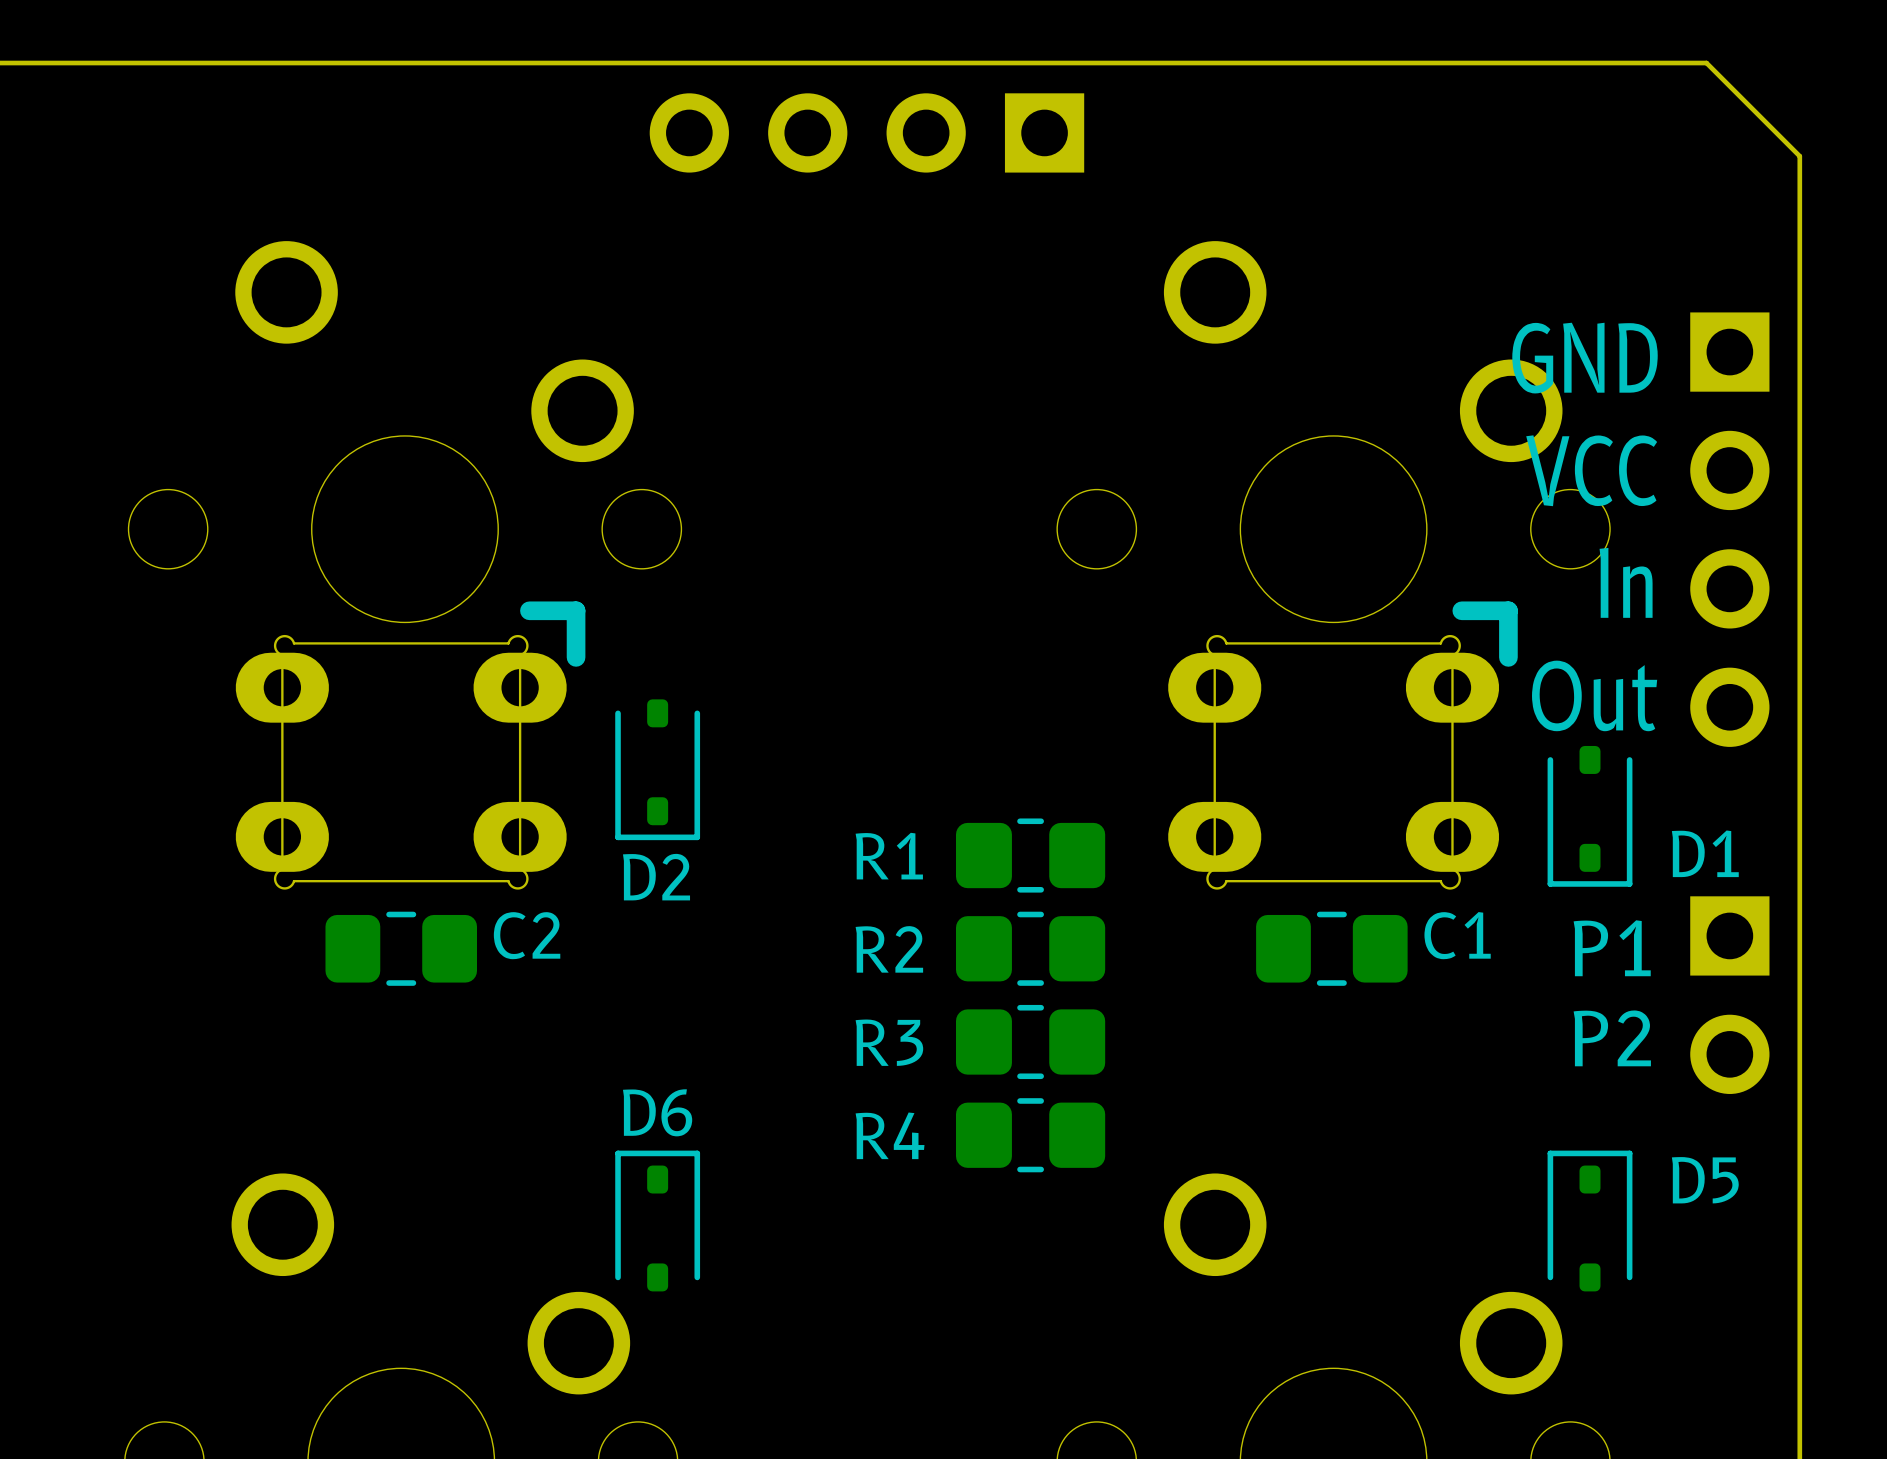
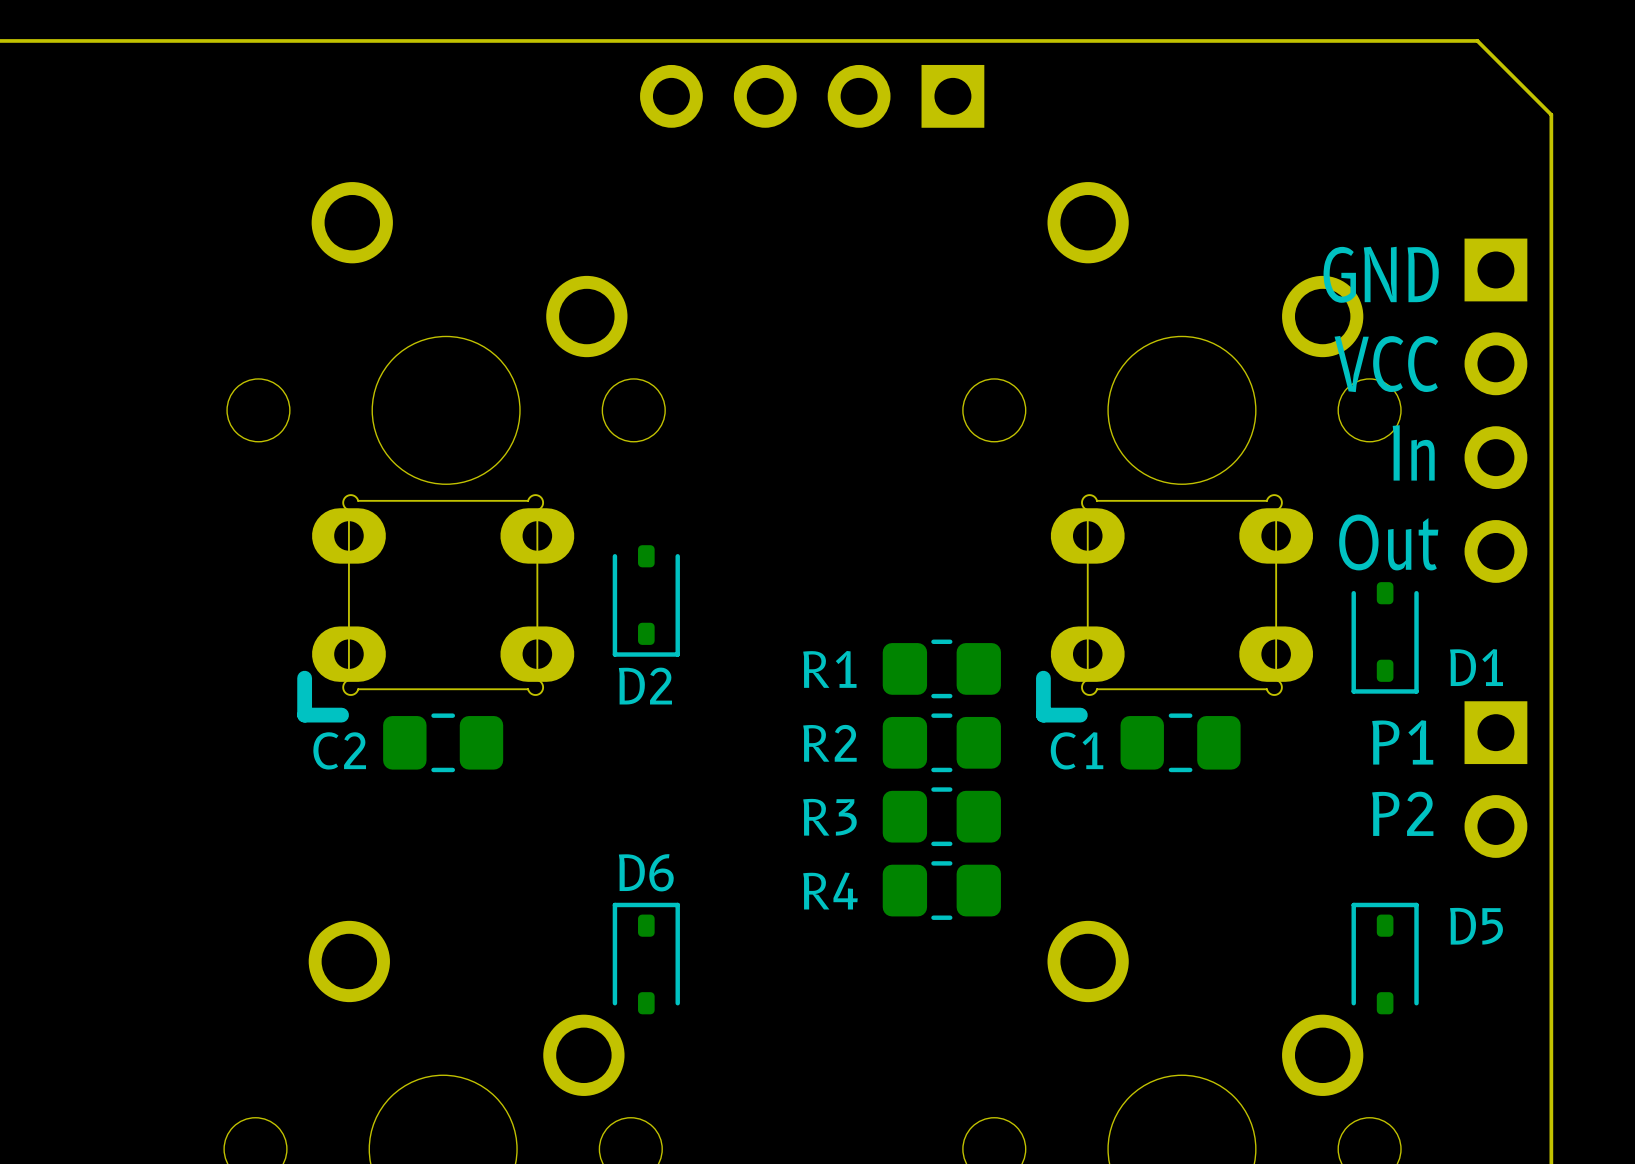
part rotation: 0° (410, 745) -> 180° (435, 608)
part rotation: 0° (1342, 745) -> 180° (1174, 608)
C2 name position: C2 (527, 935) -> C2 (339, 750)
C1 name position: C1 (1457, 935) -> C1 (1077, 750)

